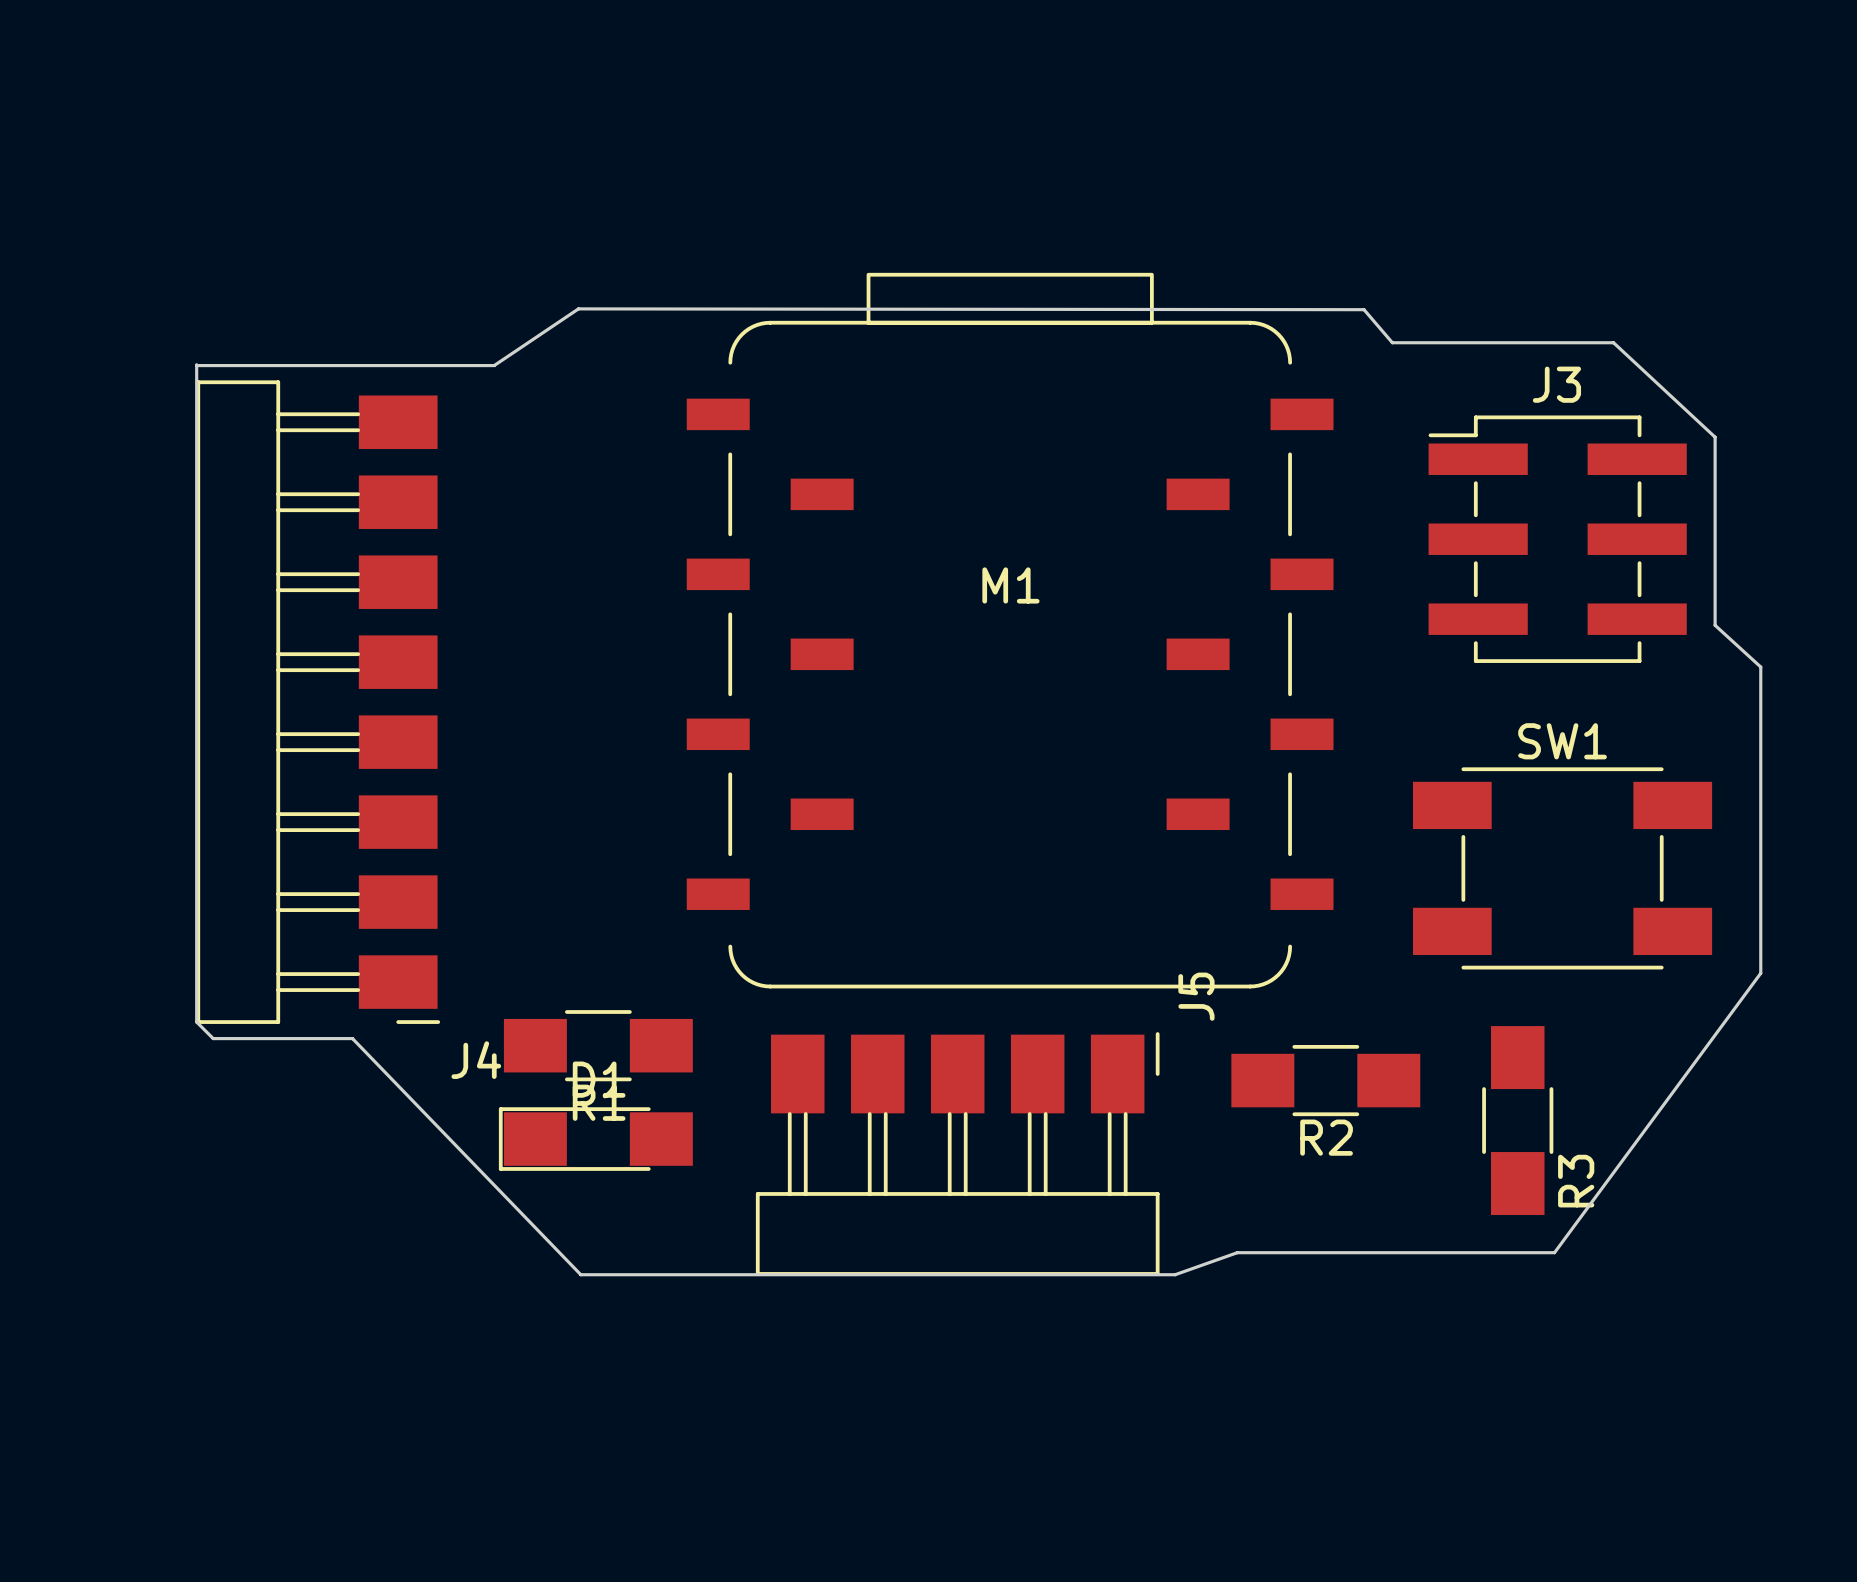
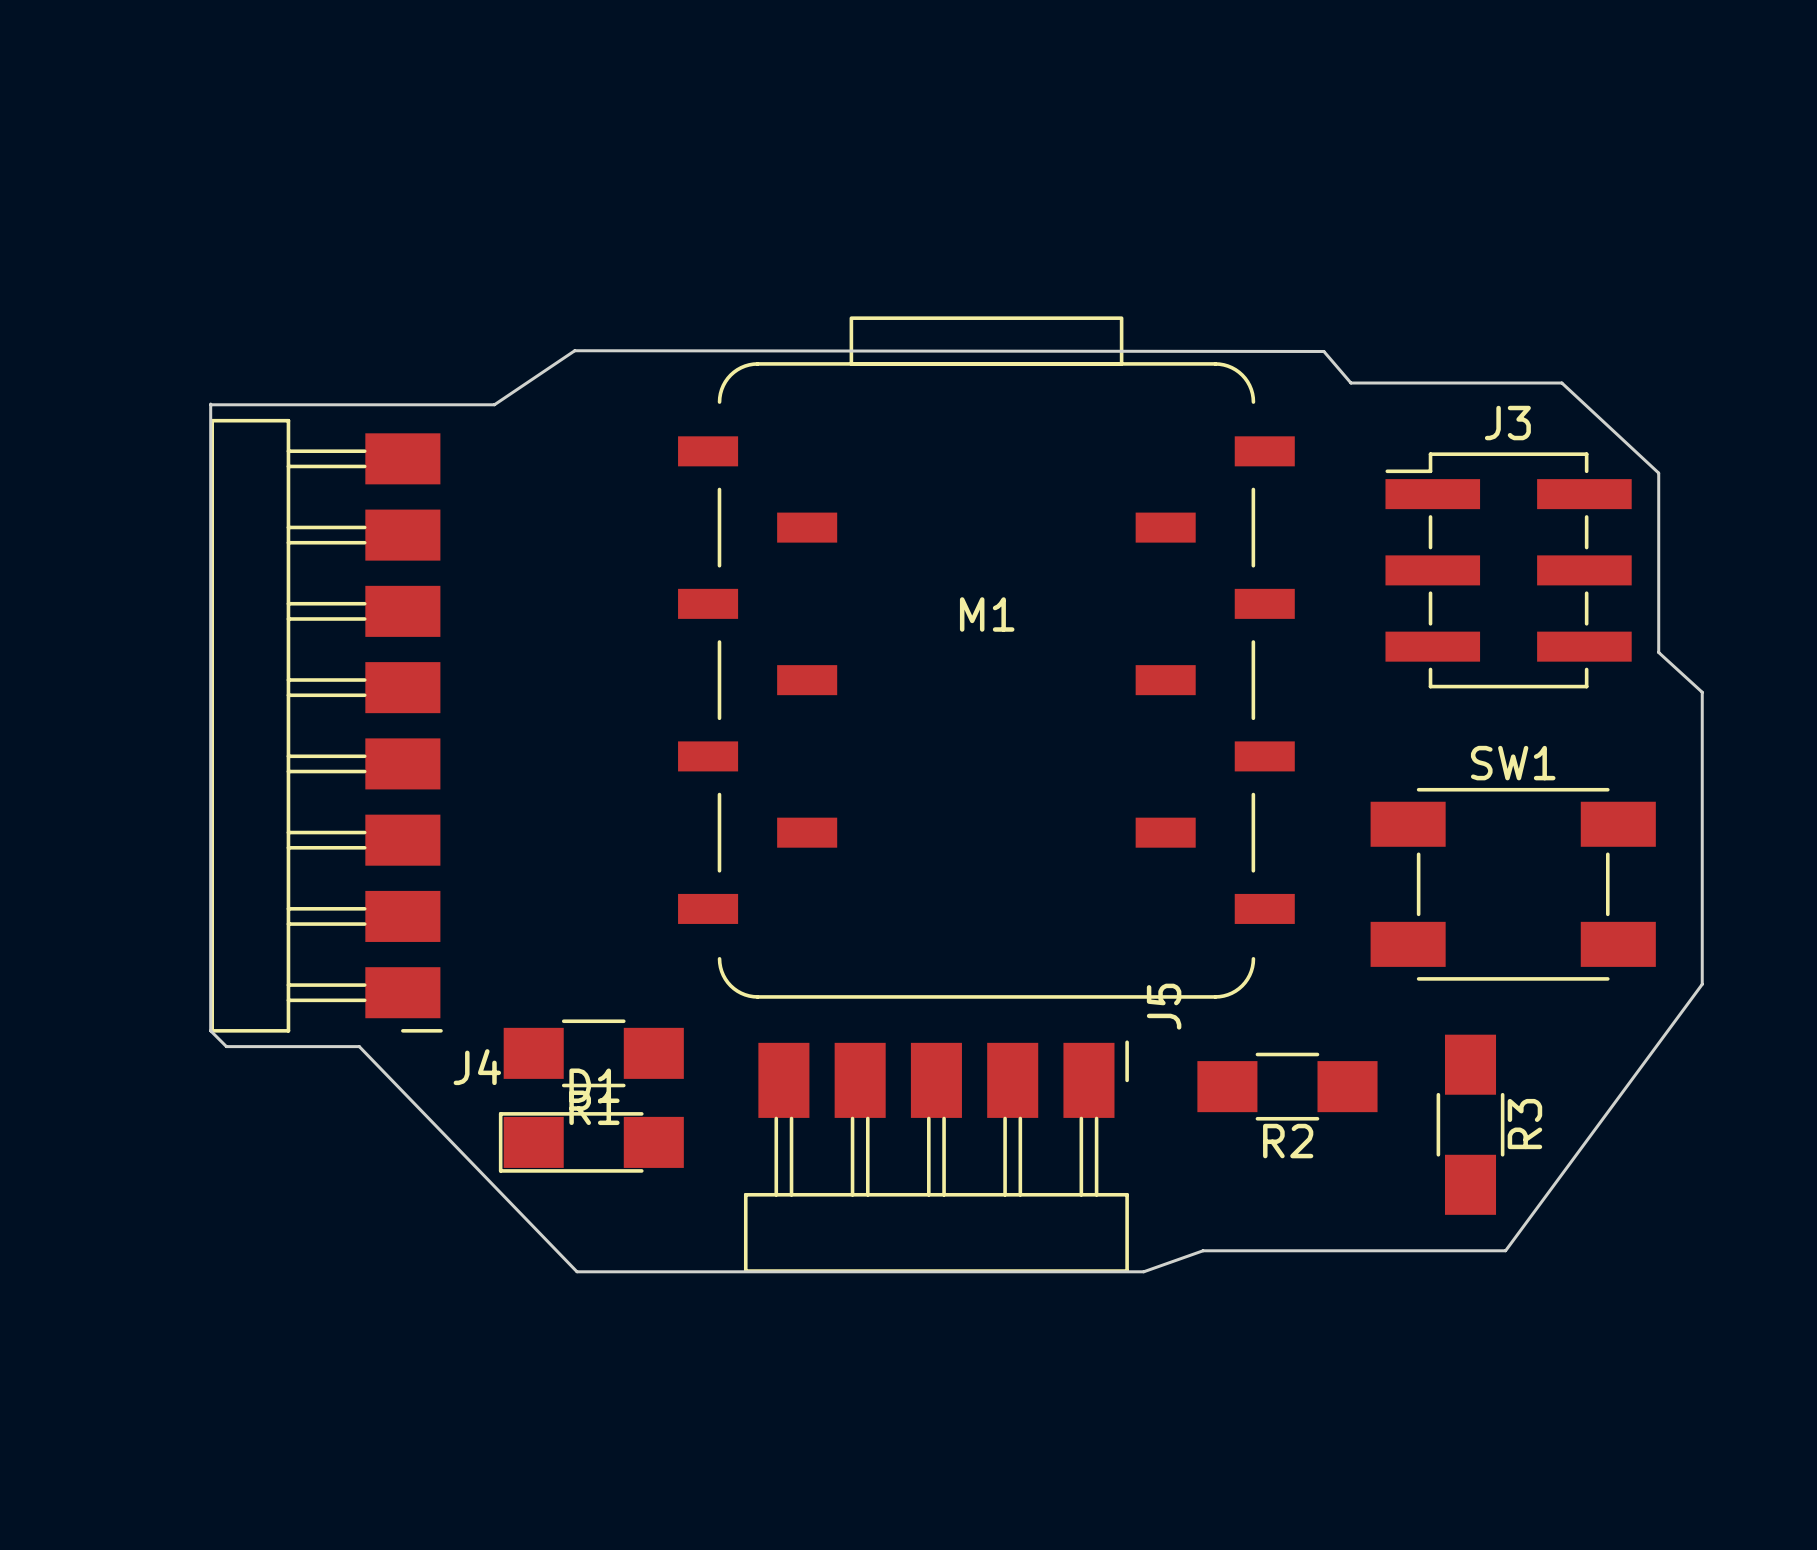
R3 name position: R3 (1576, 1181) -> R3 (1524, 1124)

